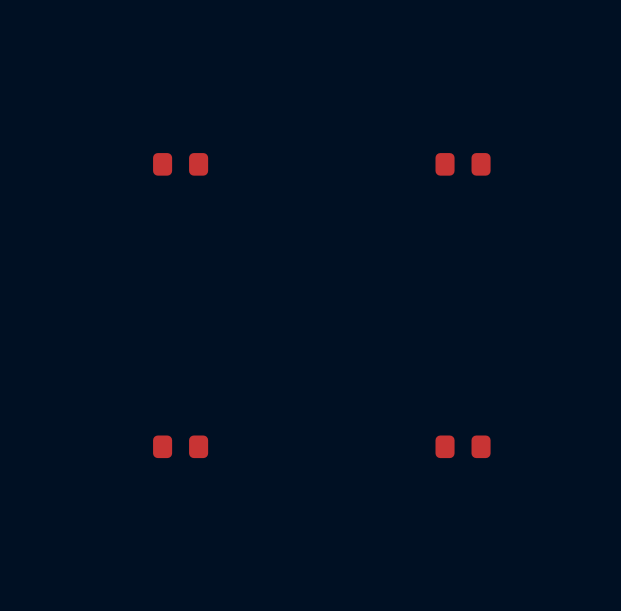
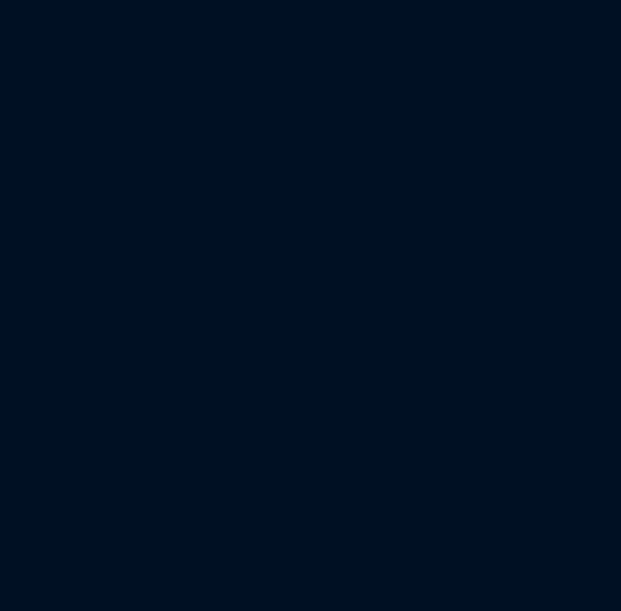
part: (180, 164) -> none
part: (463, 164) -> none
part: (180, 446) -> none
part: (463, 446) -> none

